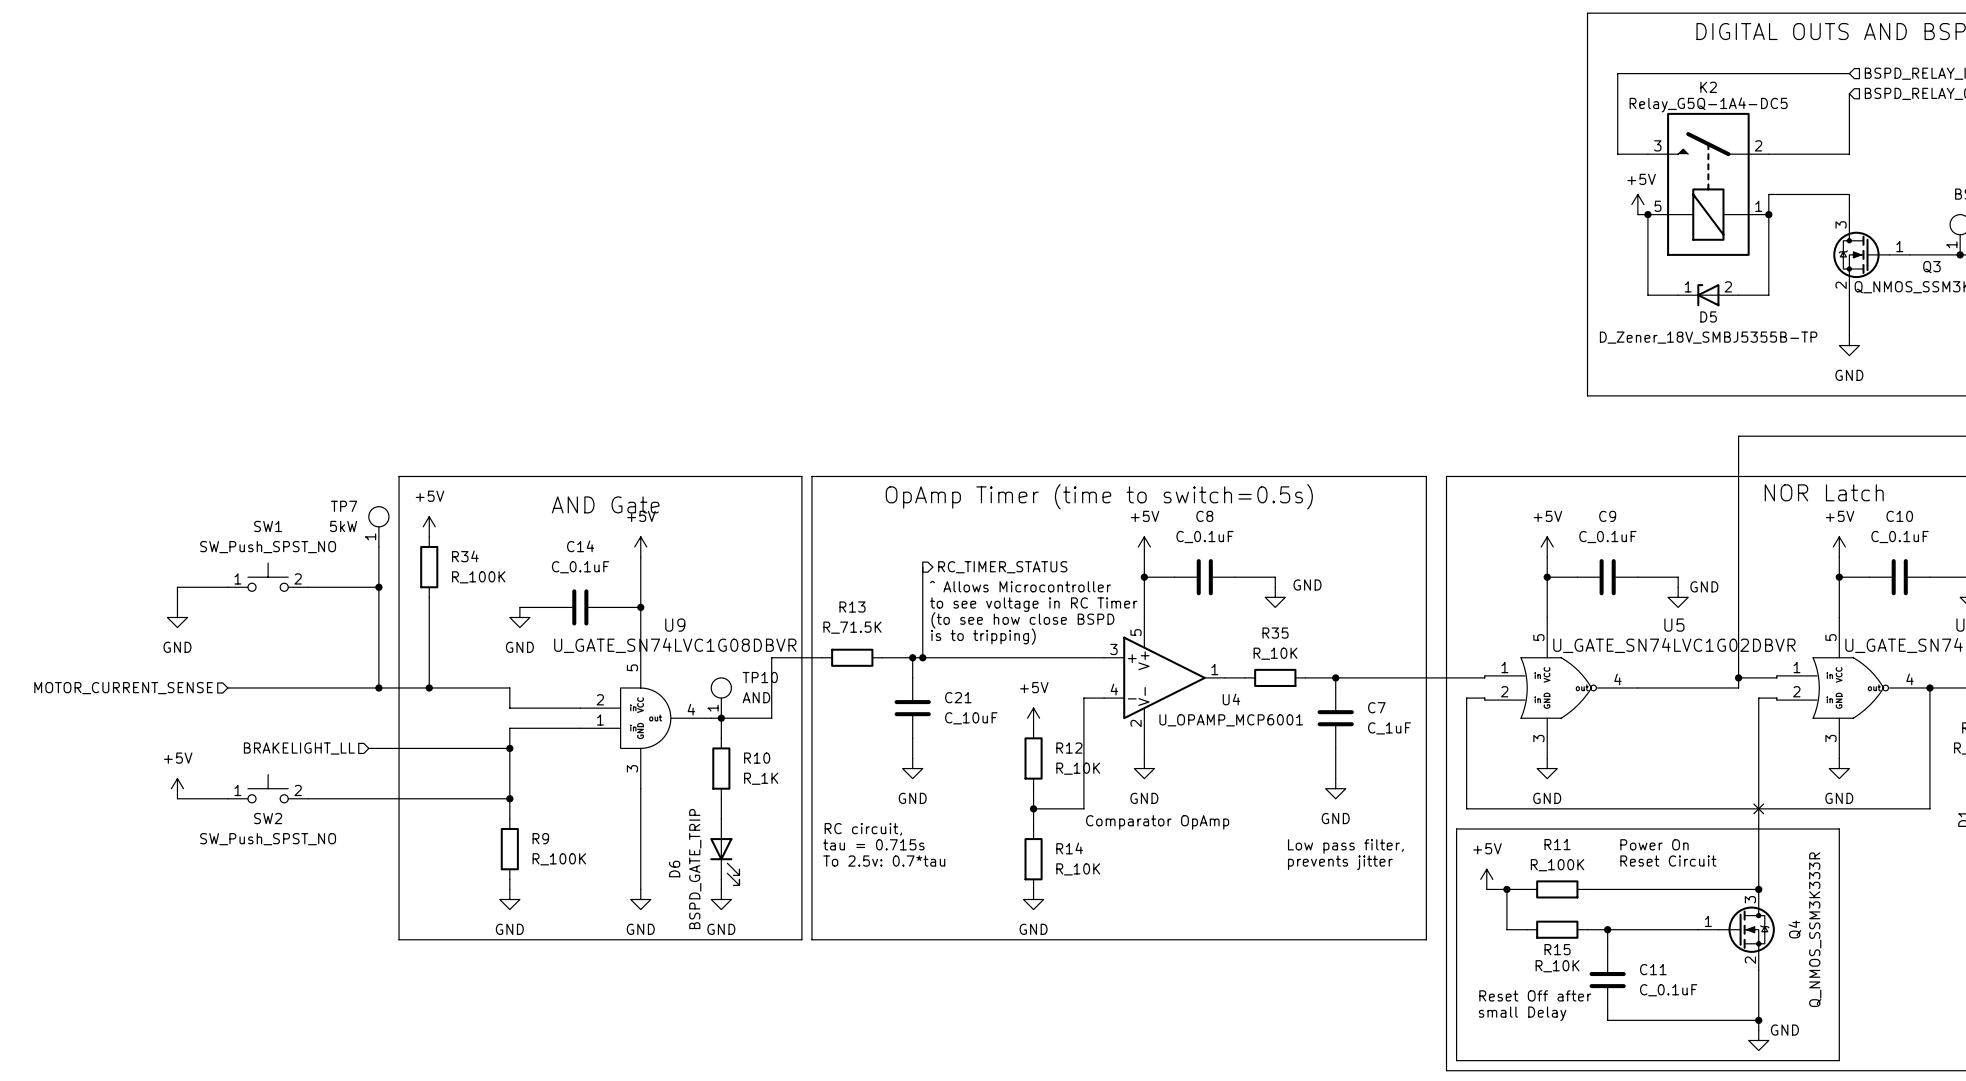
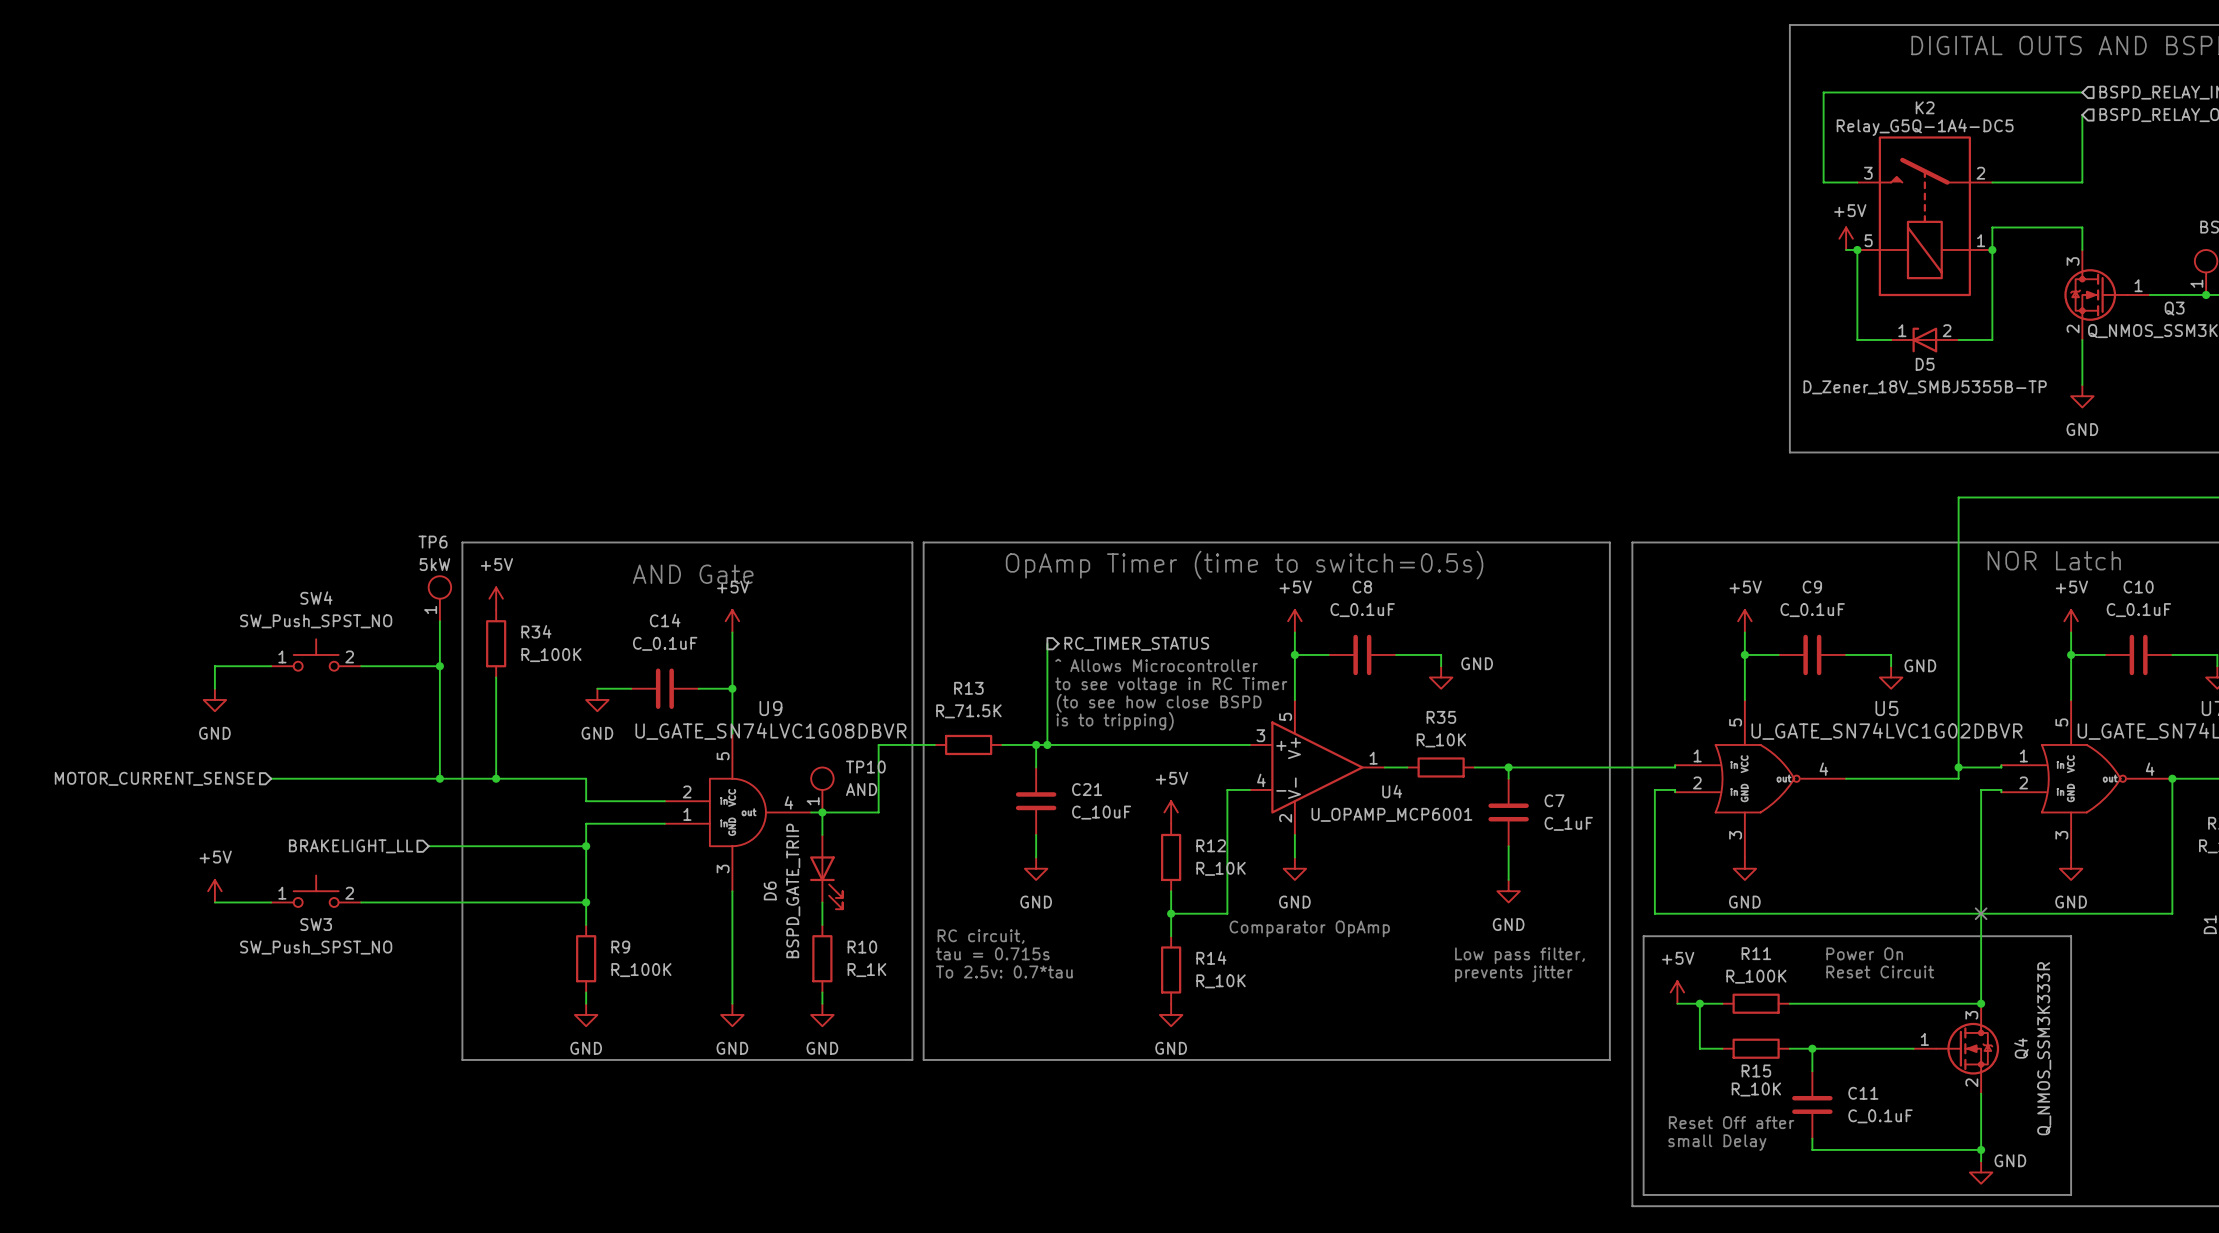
TP7 name: TP7 (344, 506) -> TP6 (433, 542)
SW1 name: SW1 (268, 526) -> SW4 (316, 598)
TP7 value position: 5kW (343, 526) -> 5kW (434, 564)
R10 position: (721, 768) -> (822, 958)
SW2 name: SW2 (268, 818) -> SW3 (316, 924)
D6 position: (724, 852) -> (826, 872)

